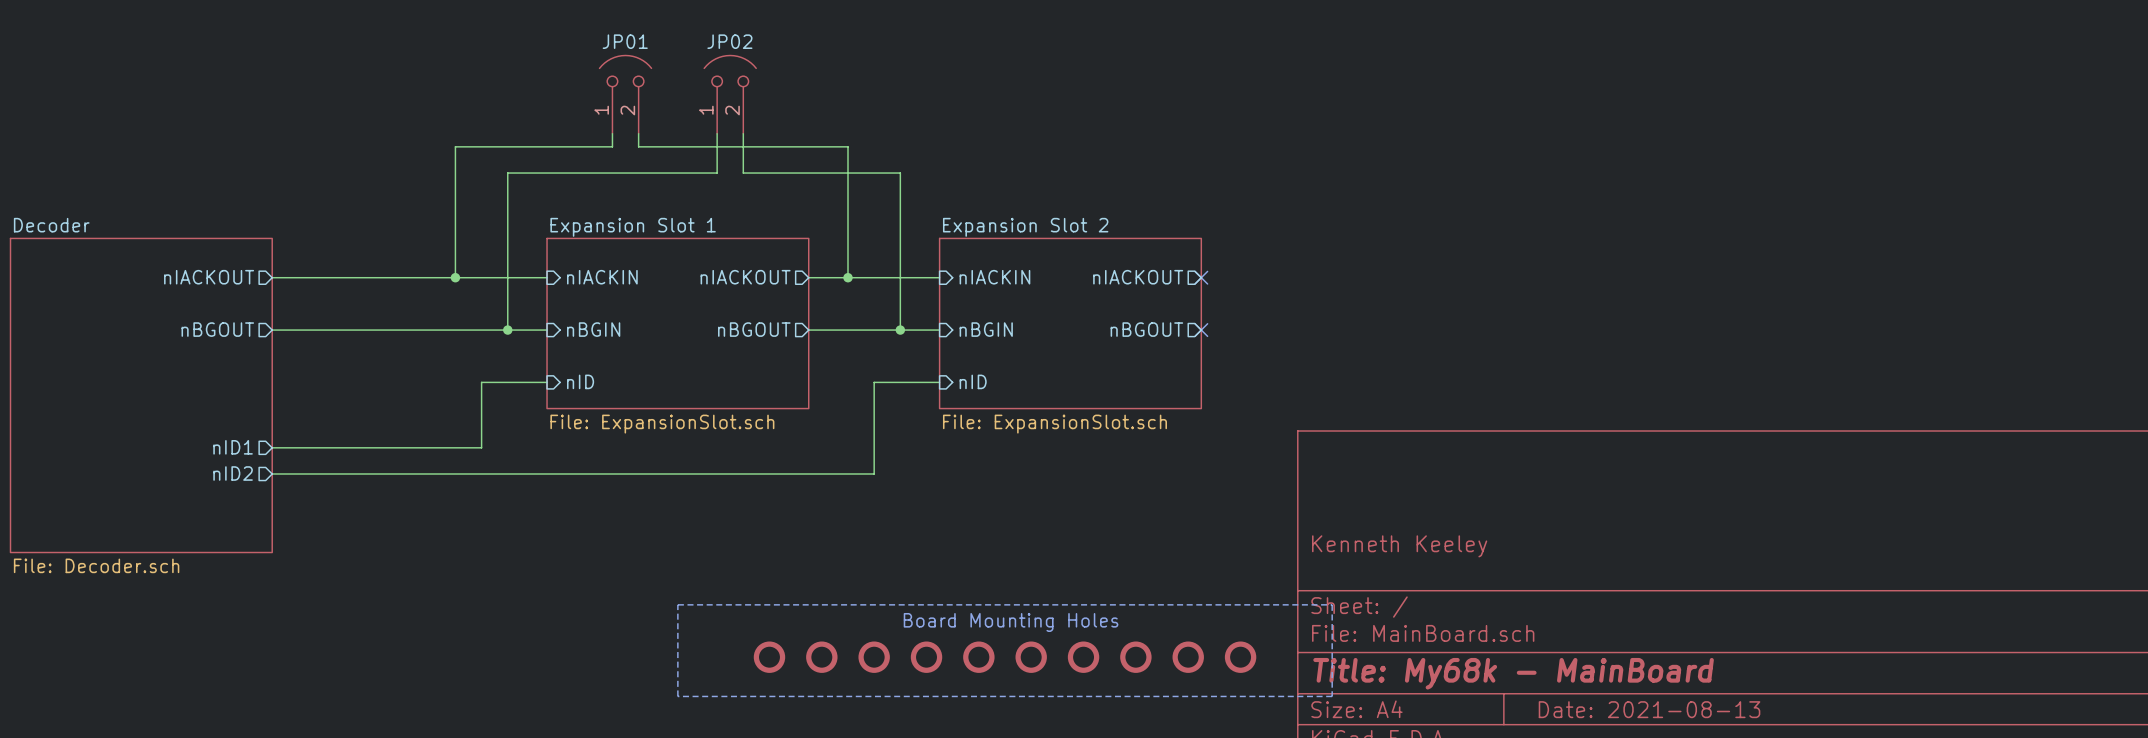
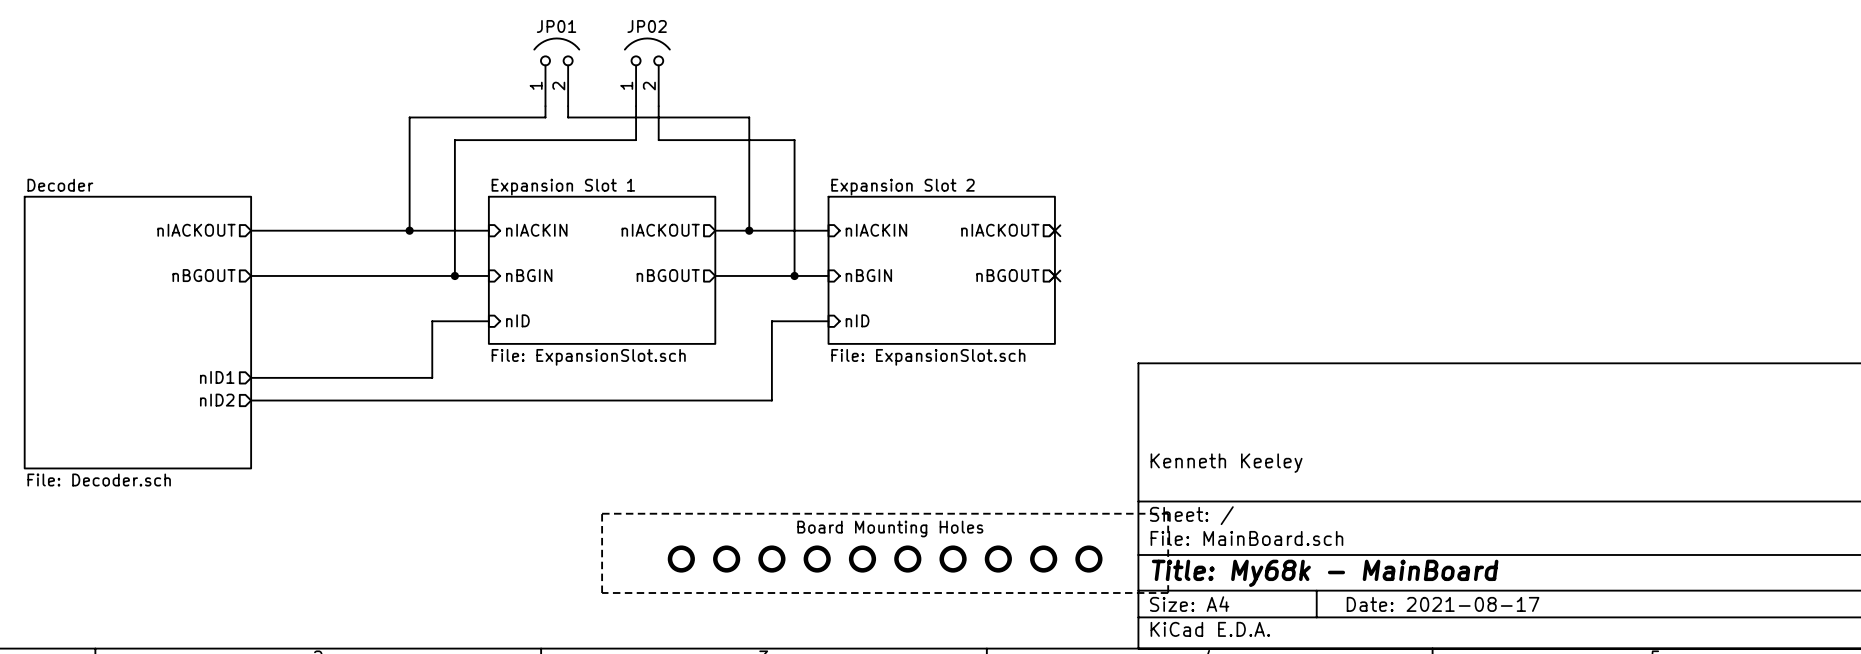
title block: Date: 2021-08-13 (1649, 709) -> Date: 2021-08-17 (1443, 604)

